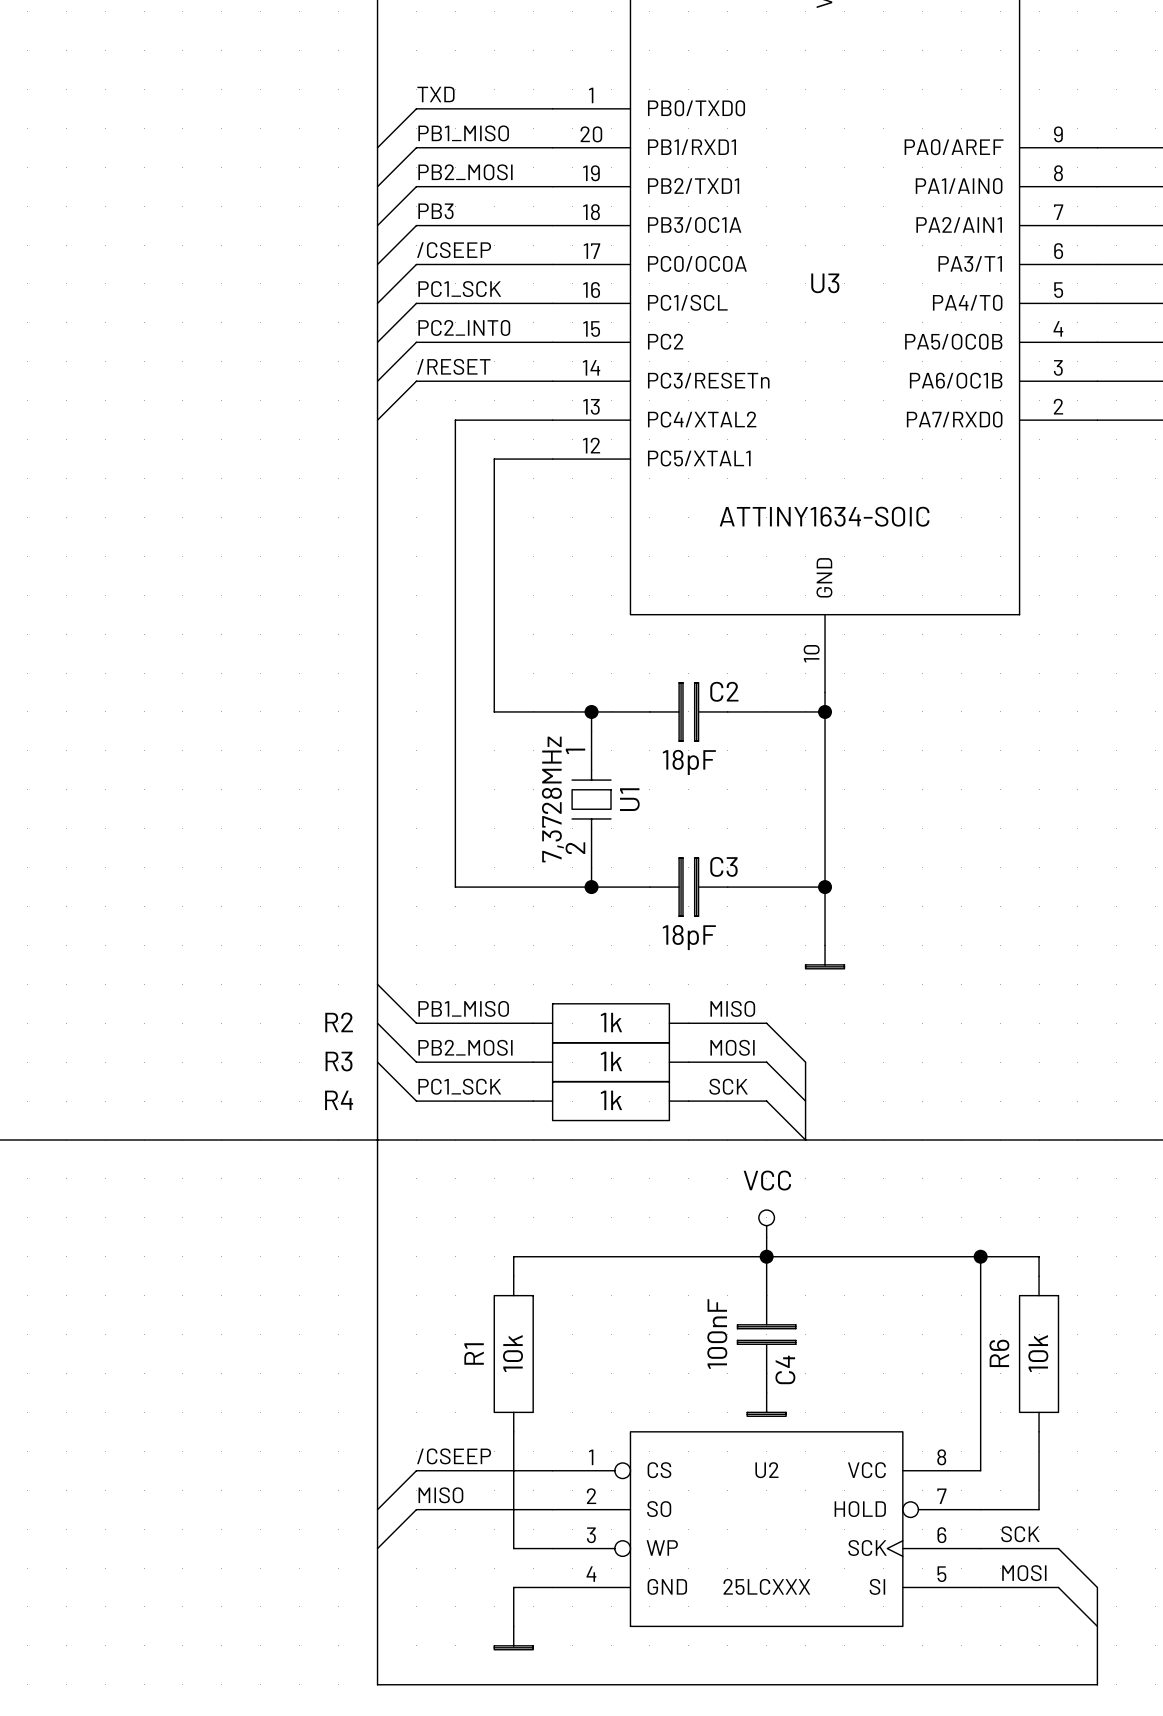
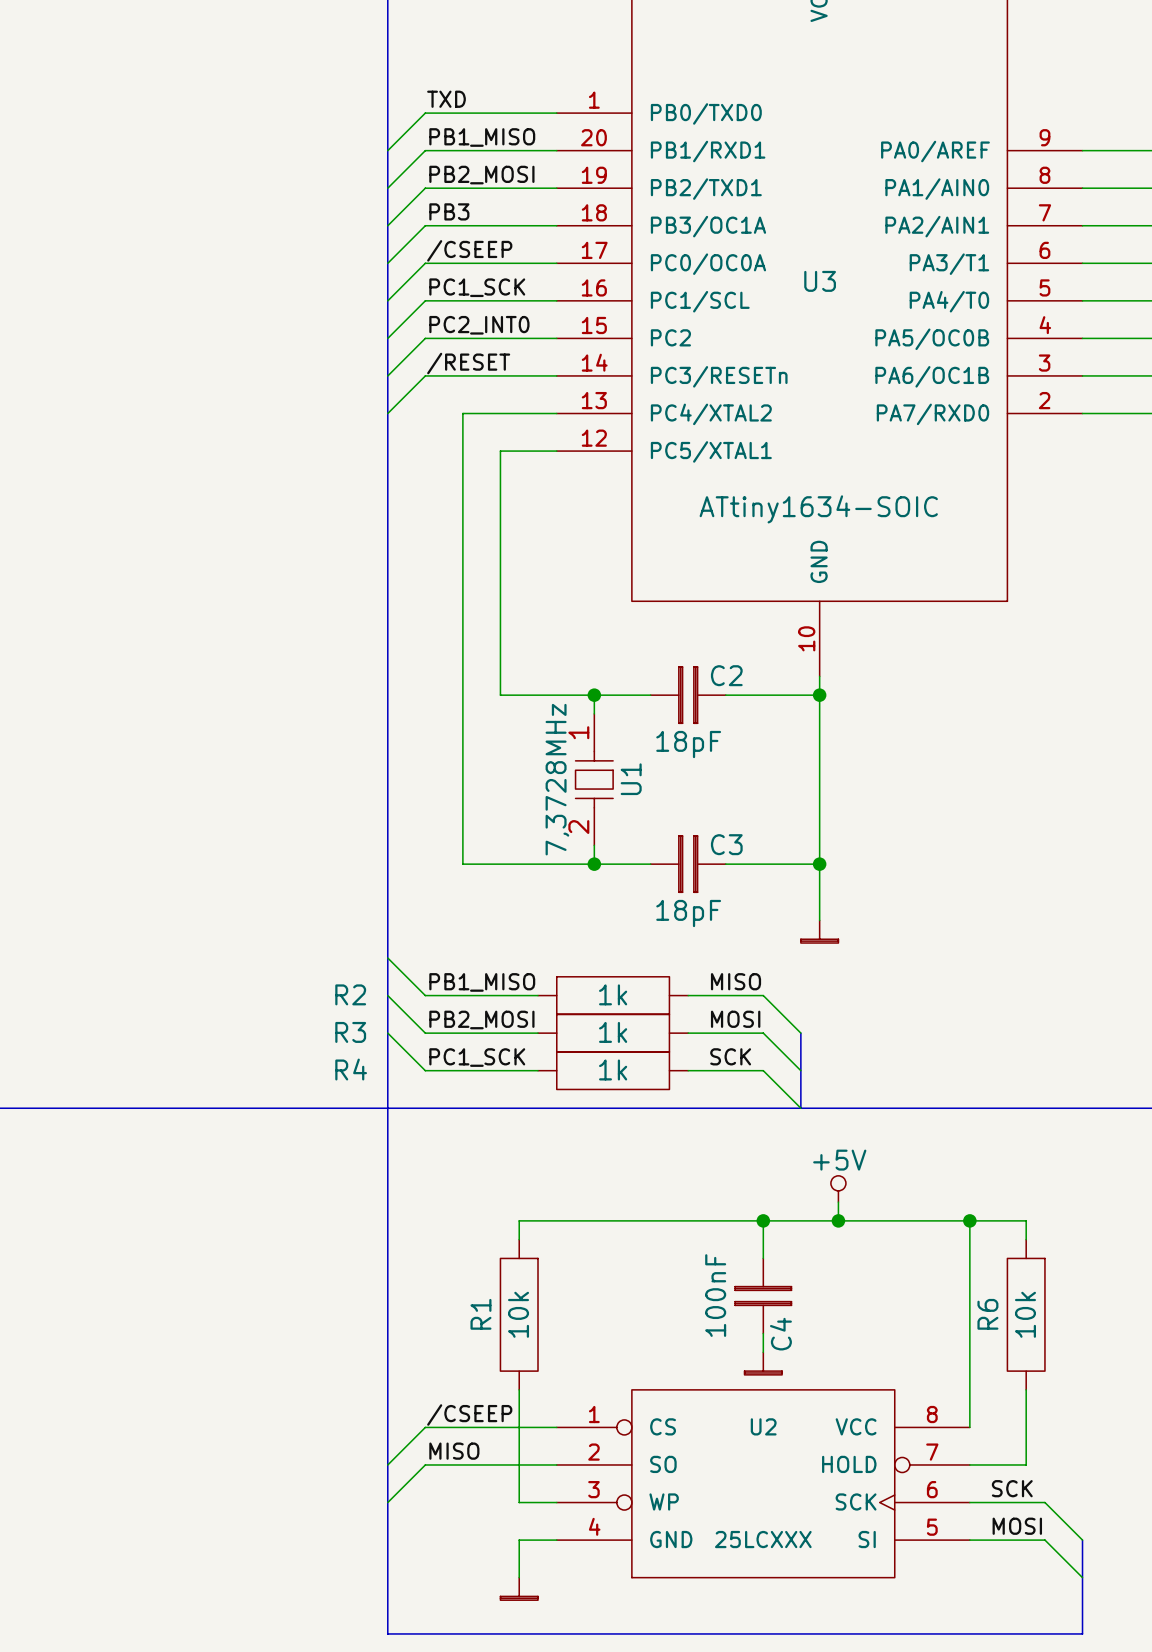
U3 value: ATTINY1634-SOIC (824, 516) -> ATtiny1634-SOIC (818, 509)
power symbol: VCC (766, 1223) -> none
power symbol: none -> +5V (838, 1188)
wire: (766, 1237) (766, 1256) -> (838, 1202) (838, 1220)
junction: none -> (838, 1220)

